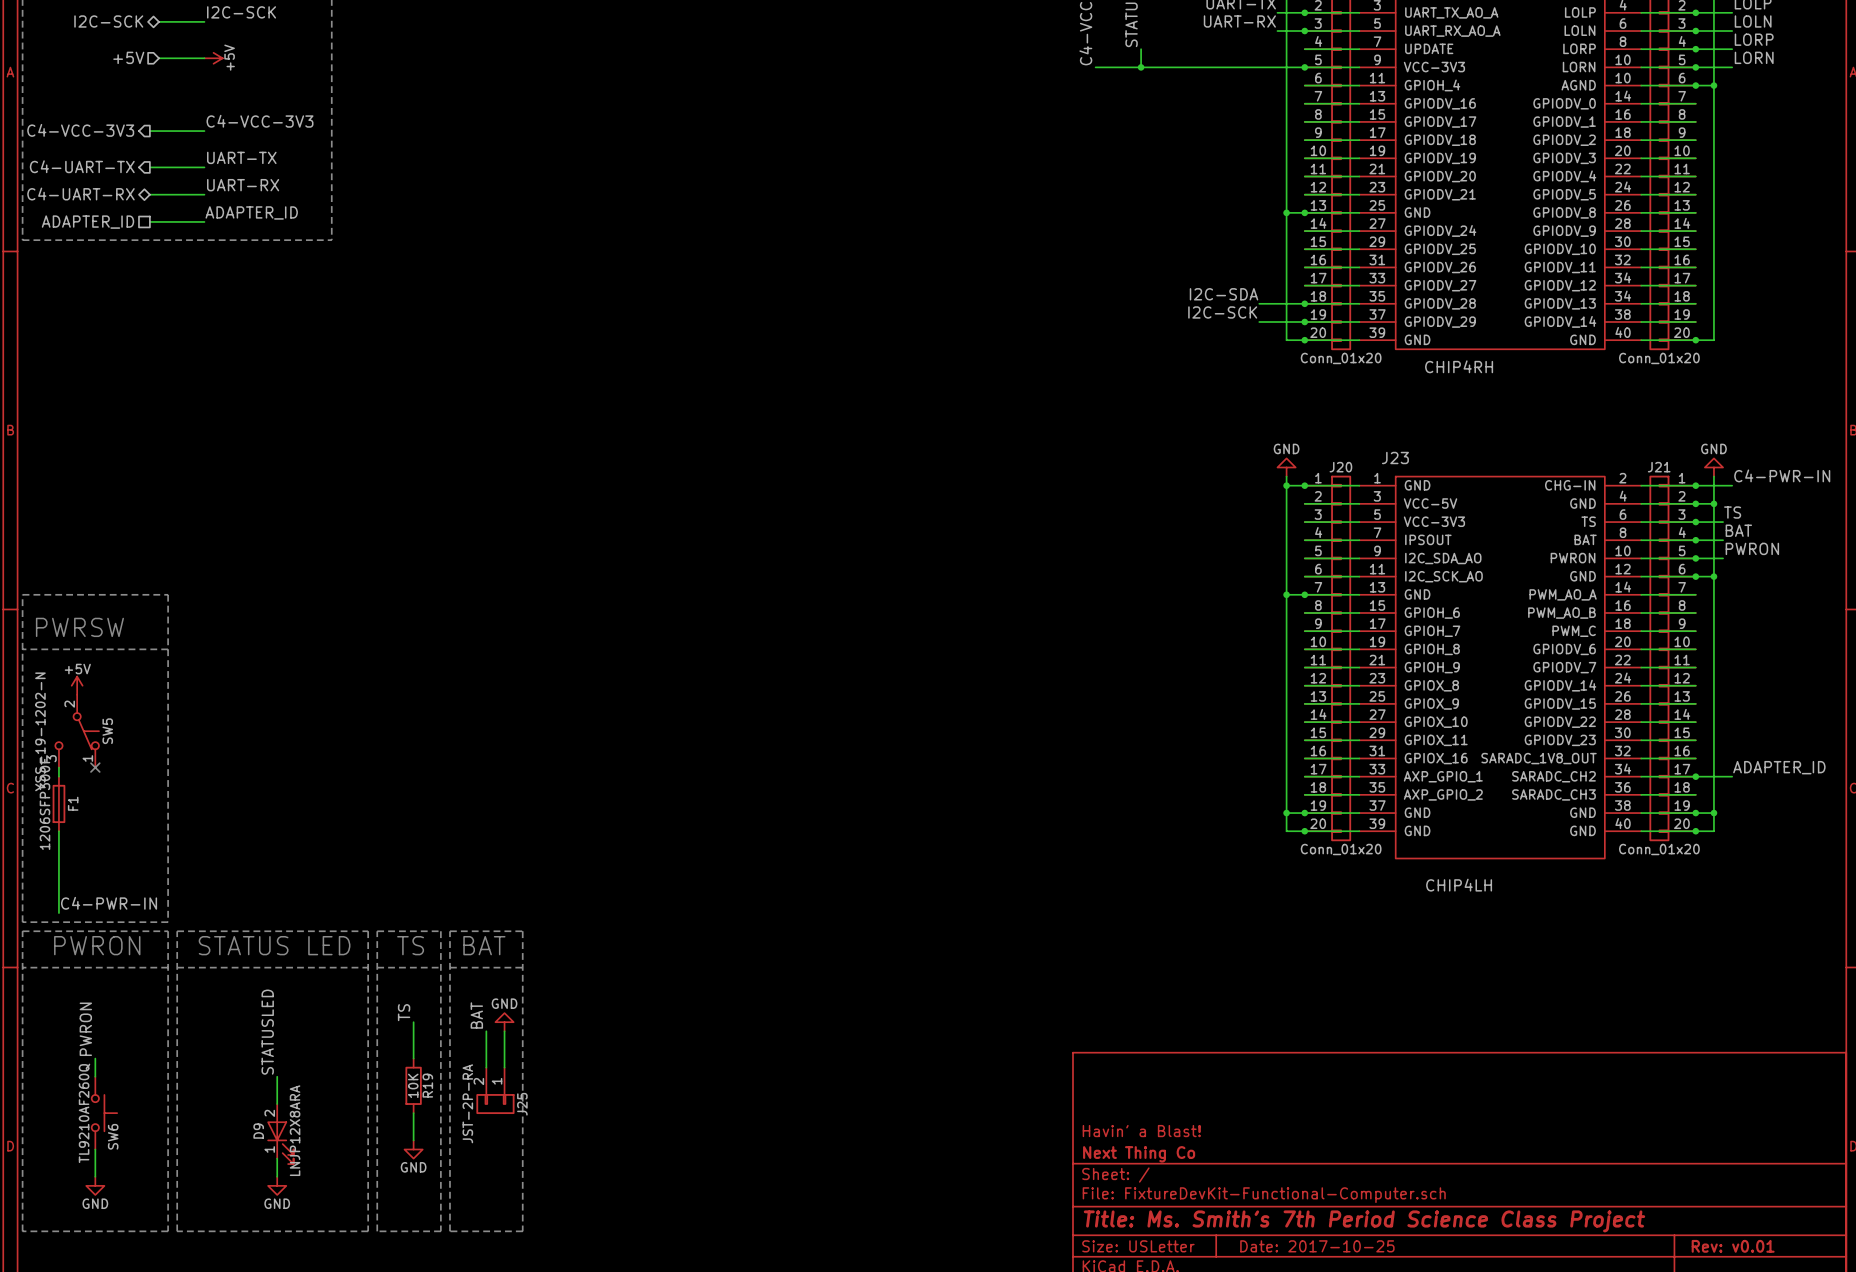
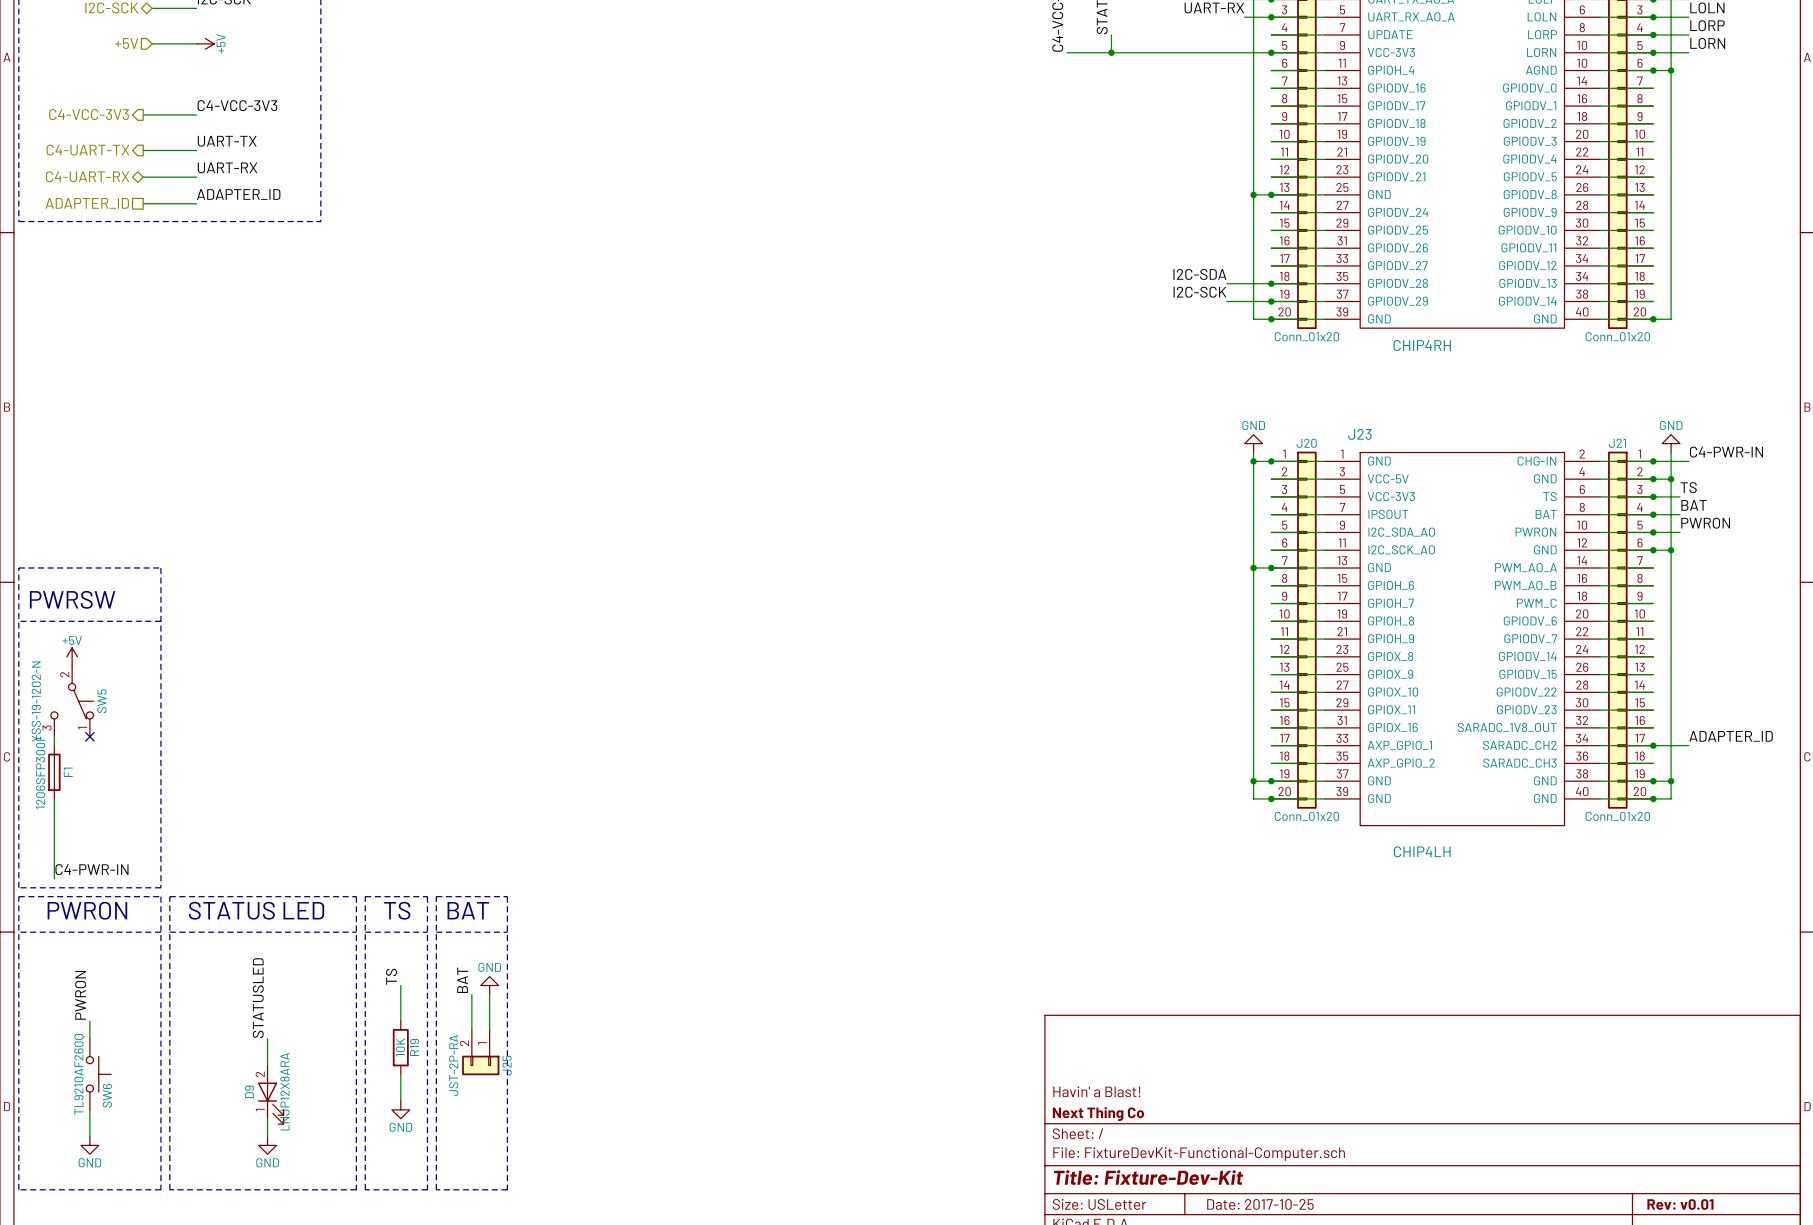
title block: Title: Ms. Smith's 7th Period Science Class Project (1364, 1221) -> Title: Fixture-Dev-Kit (1148, 1177)

